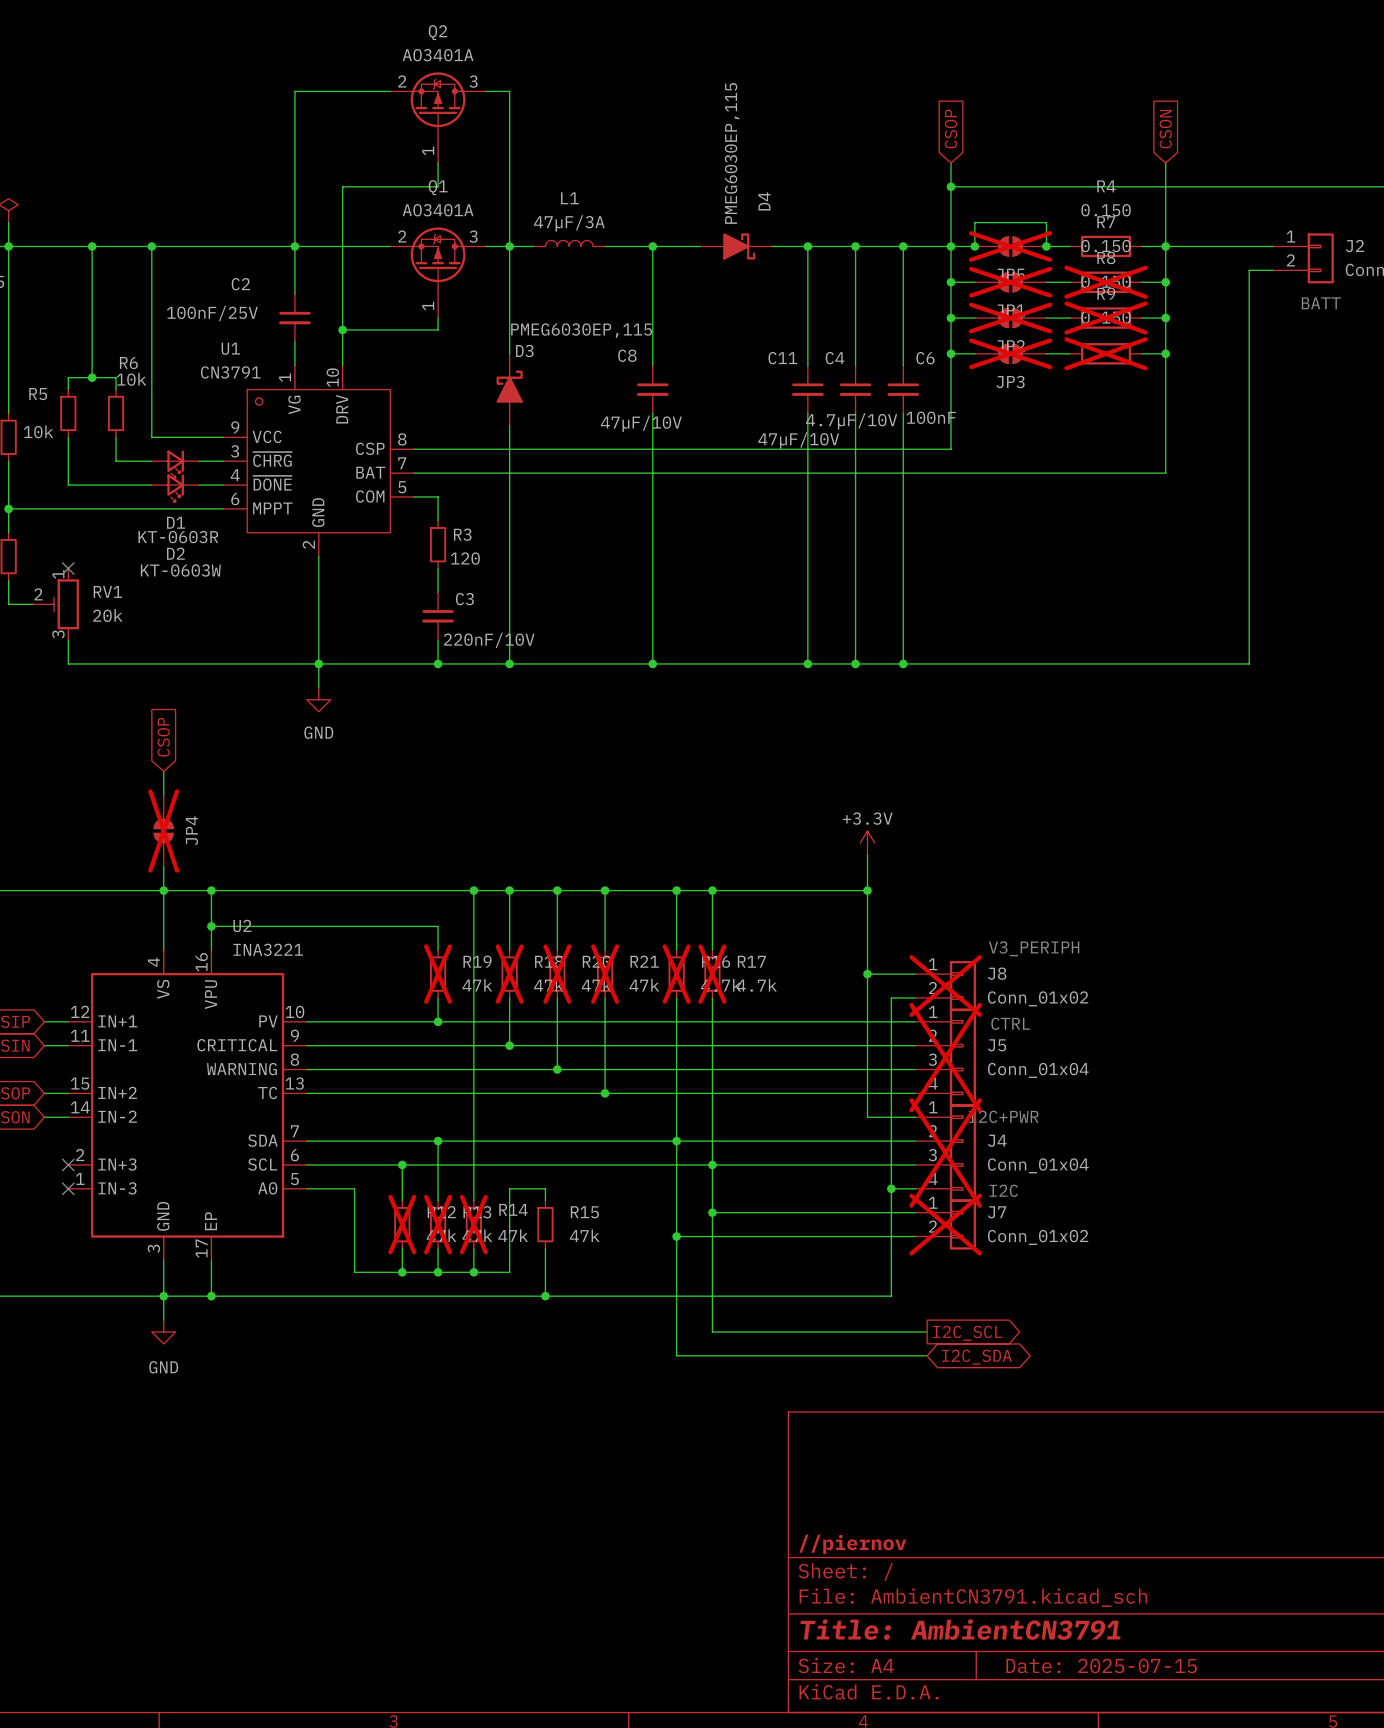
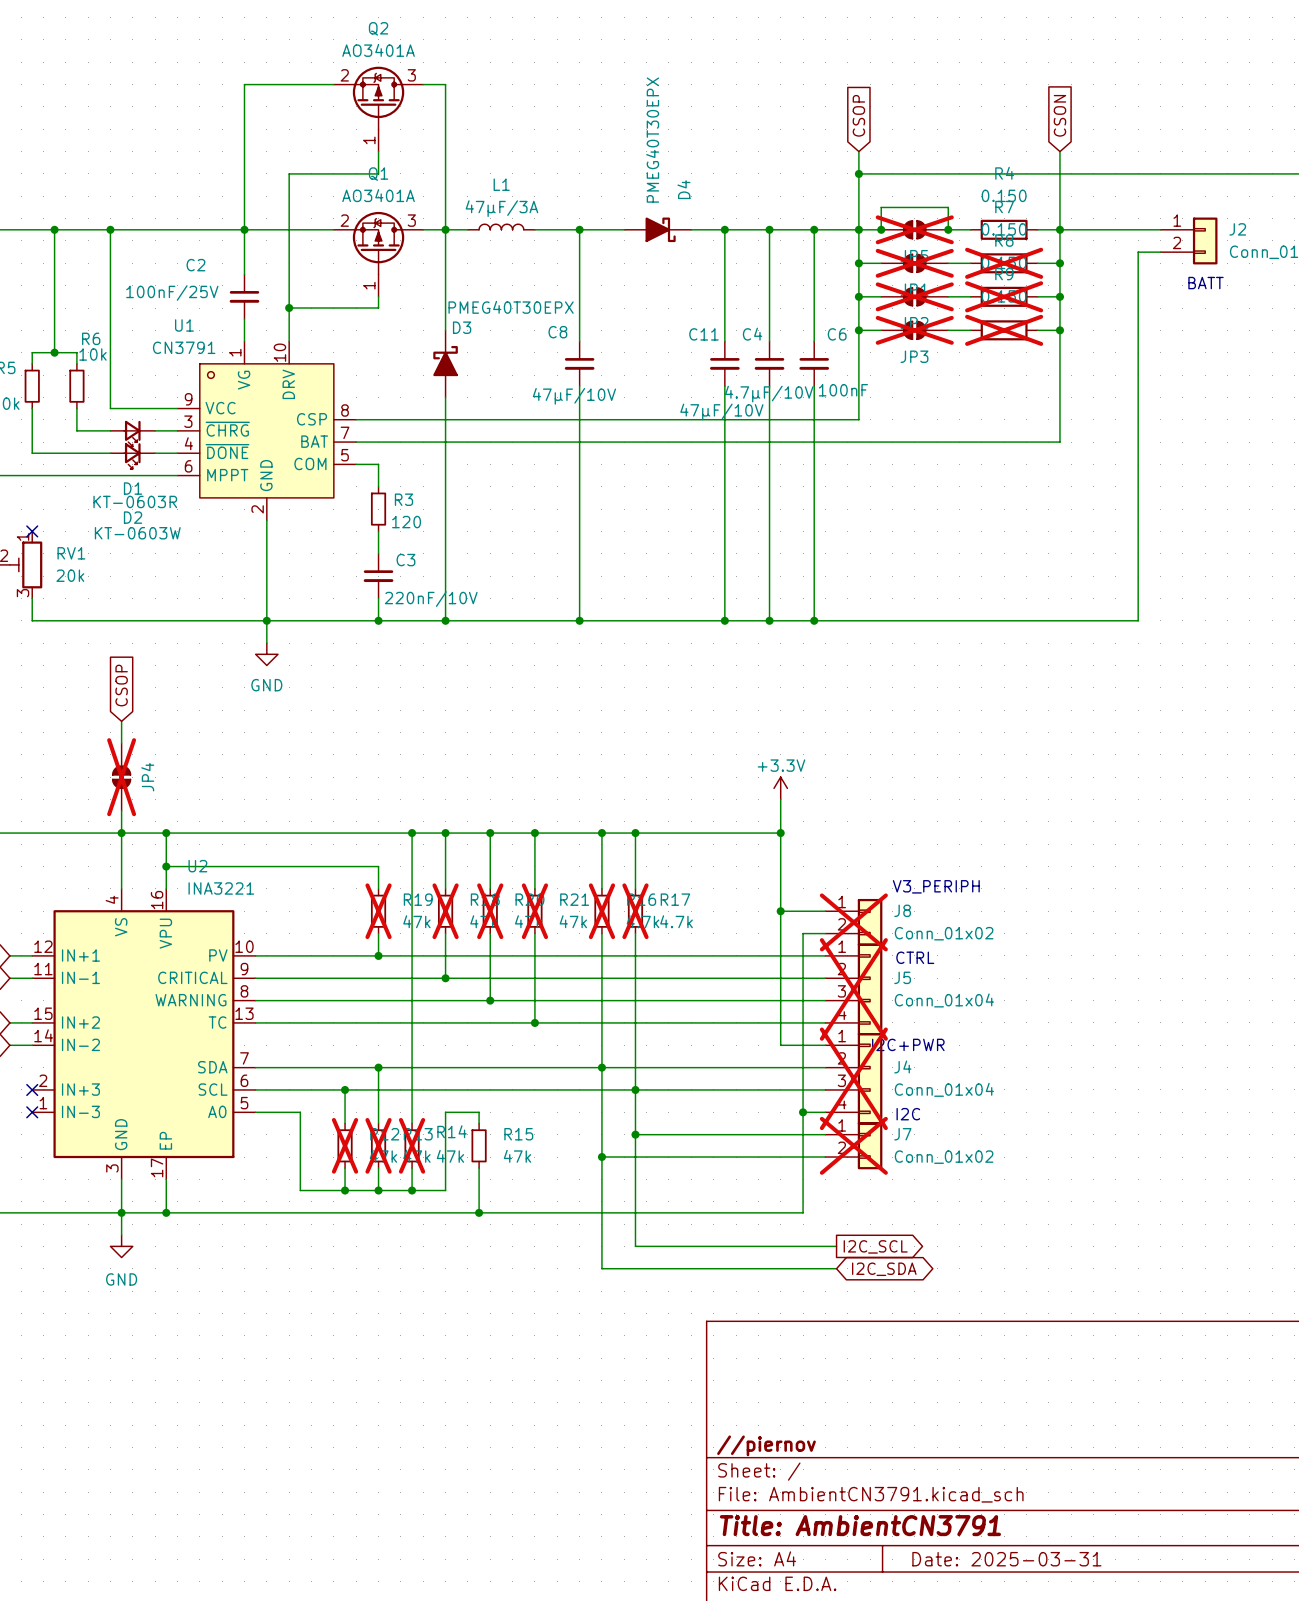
D4 value: PMEG6030EP,115 (732, 153) -> PMEG40T30EPX (652, 140)
D3 value: PMEG6030EP,115 (581, 330) -> PMEG40T30EPX (511, 307)
title block: Date: 2025-07-15 (1101, 1665) -> Date: 2025-03-31 (1006, 1559)

